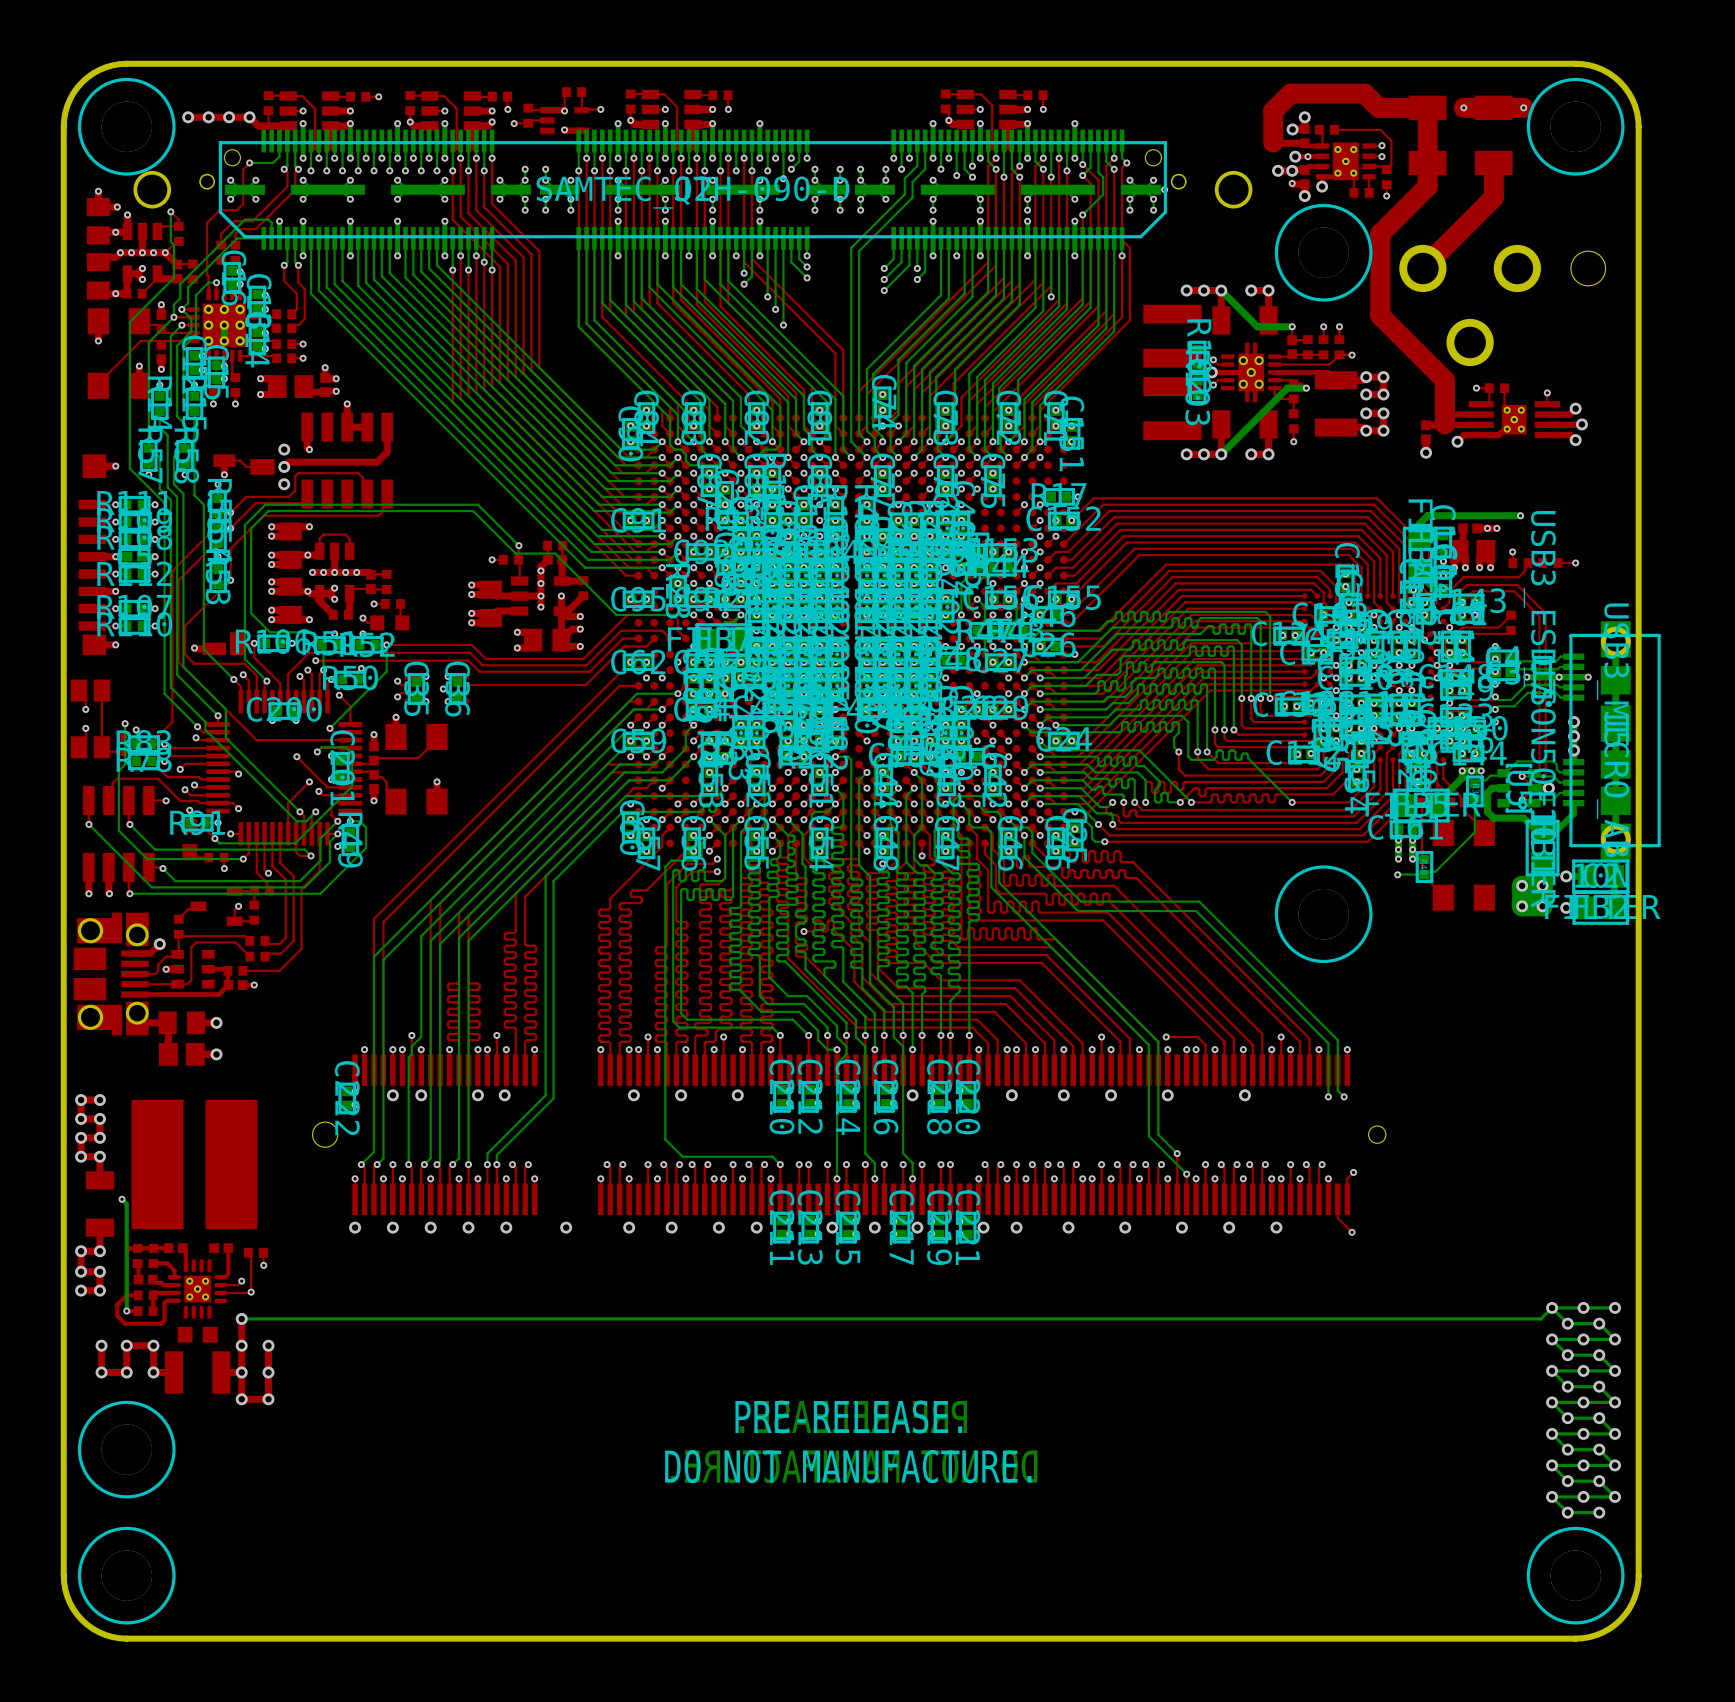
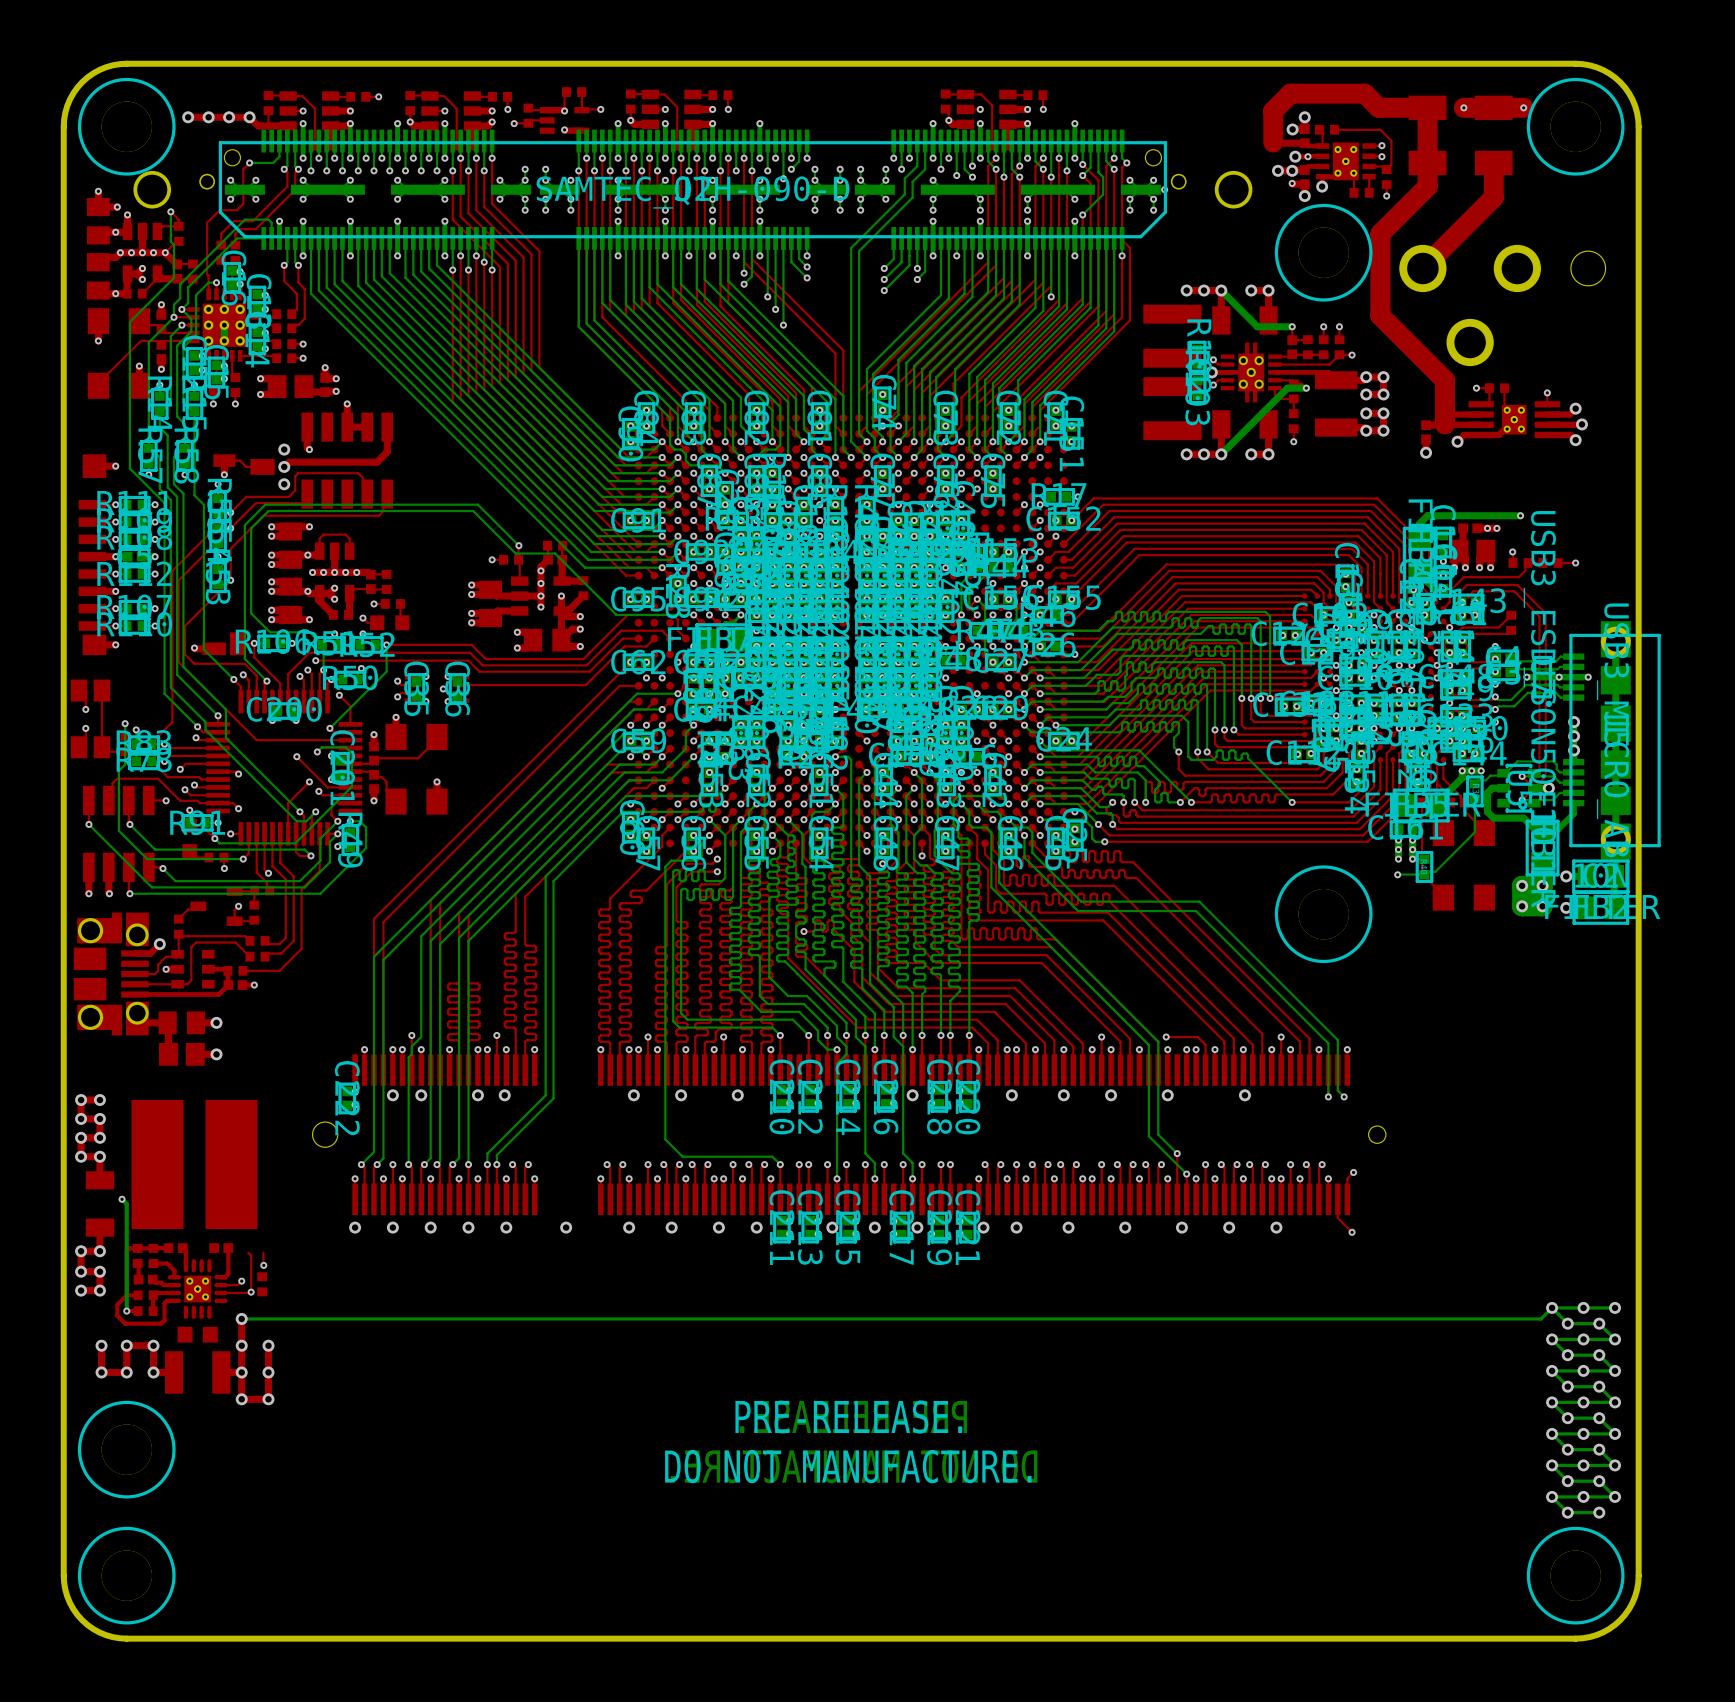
part rotation: 0° (255, 1252) -> 90° clockwise (262, 1284)
part position: (255, 1252) -> (262, 1284)

